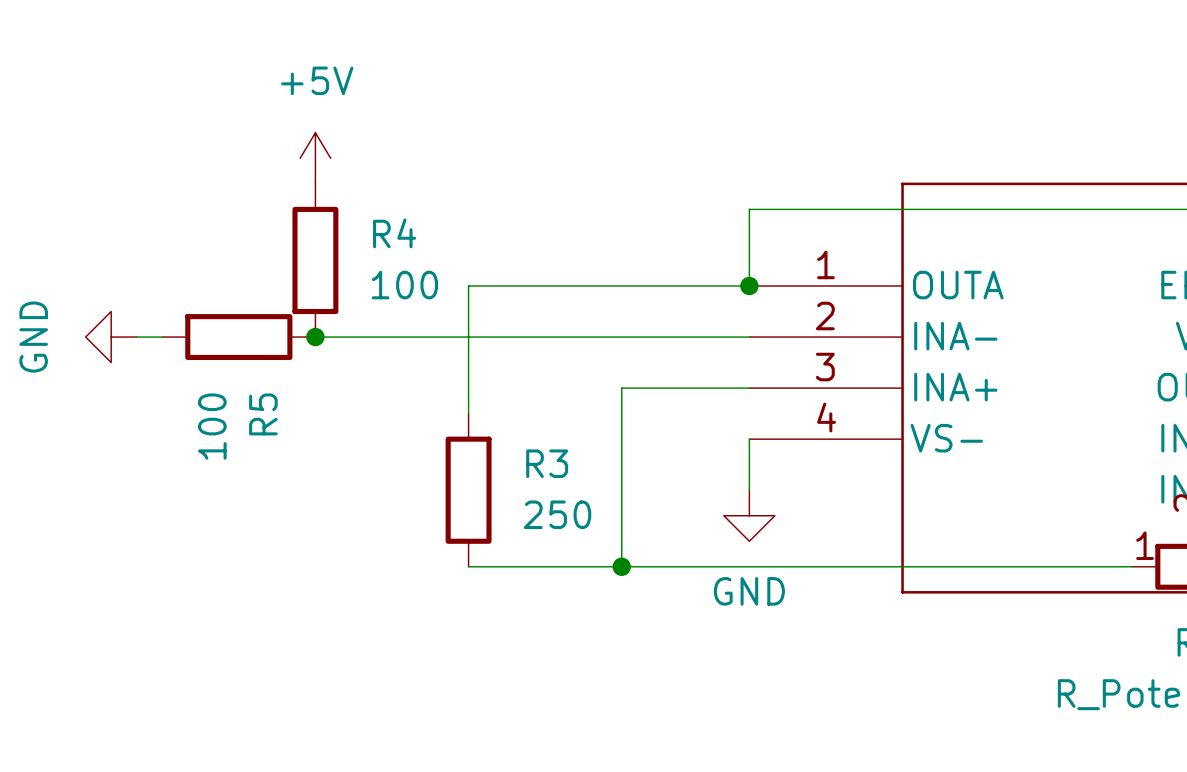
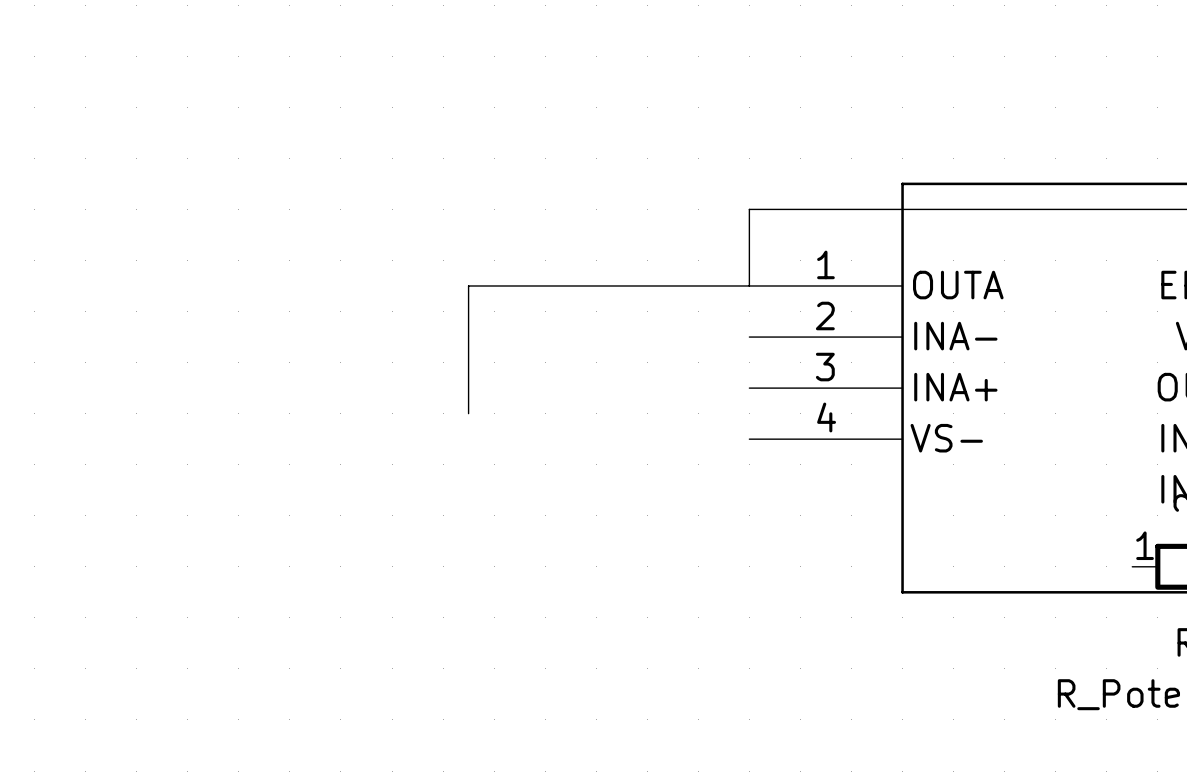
power symbol: +5V (315, 158) -> none
R4: 100 (315, 260) -> none
junction: (749, 285) -> none
power symbol: GND (111, 337) -> none
wire: (136, 337) (162, 337) -> none
R5: 100 (238, 337) -> none
wire: (315, 337) (749, 337) -> none
junction: (315, 337) -> none
wire: (749, 388) (621, 388) (621, 566) -> none
wire: (749, 439) (749, 490) -> none
R3: 250 (468, 490) -> none
power symbol: GND (749, 515) -> none
wire: (468, 566) (1132, 566) -> none
junction: (621, 566) -> none

